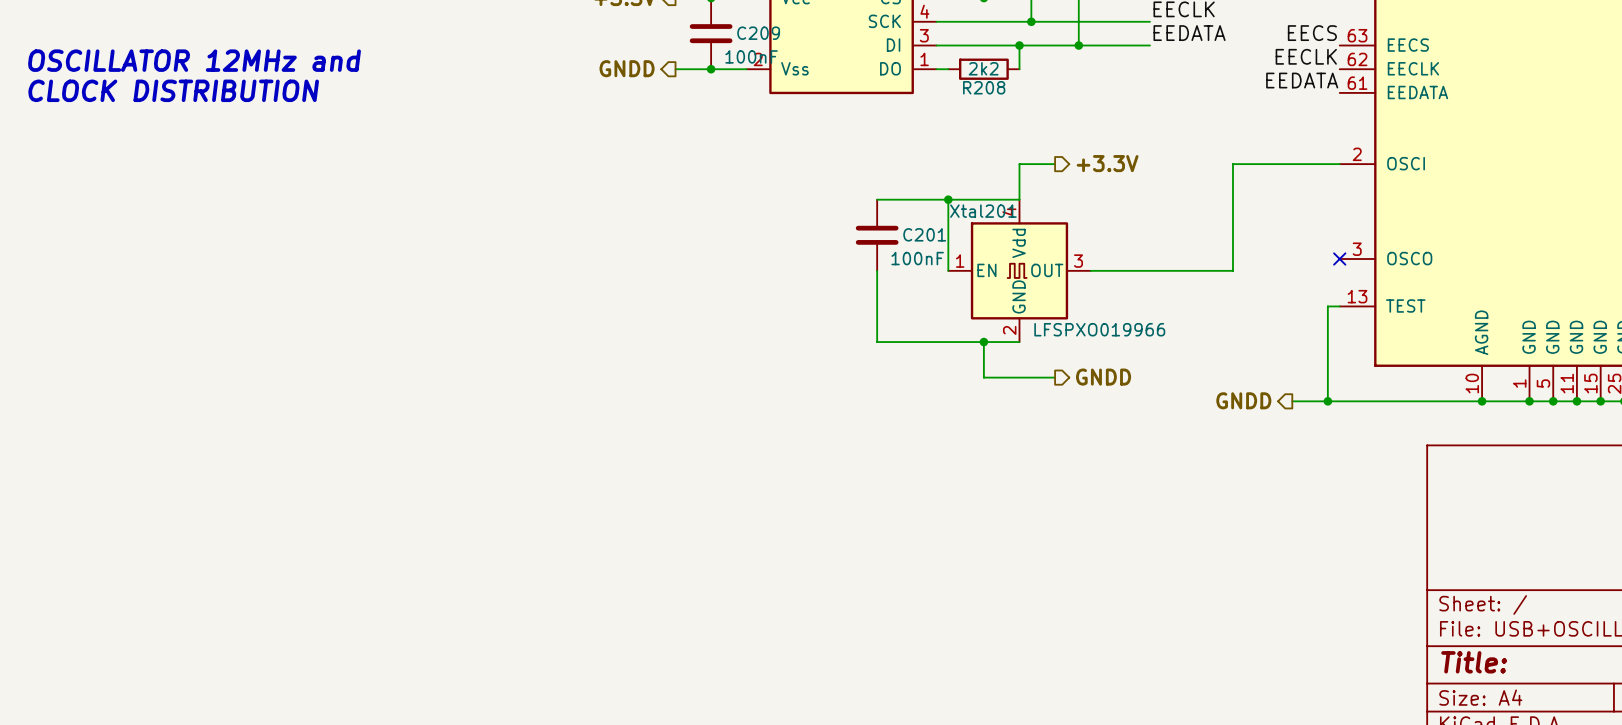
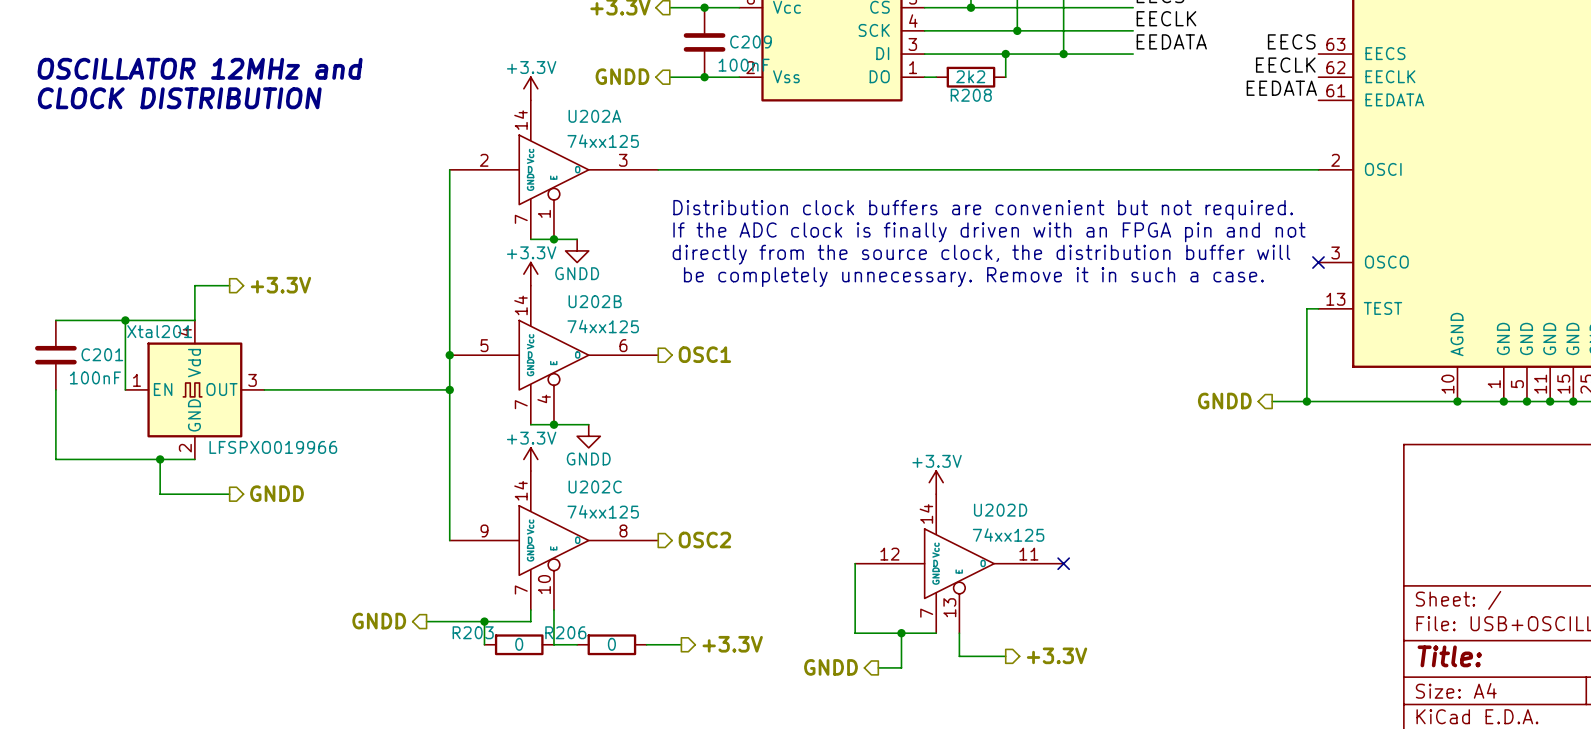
power symbol: none -> +3.3V (530, 88)
hierarchical label: +3.3V (1107, 163) -> none
wire: none -> (449, 169) (449, 540)
U202A: none -> 74xx125 (553, 169)
wire: (1019, 164) (1019, 199) (877, 199) -> (1005, 169) (658, 169)
wire: (1232, 164) (1232, 270) (1090, 270) -> (1214, 169) (1040, 169)
wire: (948, 199) (948, 270) -> none
junction: (948, 199) -> none
text: none -> Distribution clock buffers are convenient but not required. (983, 209)
text: none -> If the ADC clock is finally driven with an FPGA pin and not (989, 232)
wire: none -> (530, 239) (577, 239)
junction: none -> (553, 239)
C201 position: (877, 235) -> (55, 355)
power symbol: none -> GNDD (577, 250)
text: none -> directly from the source clock, the distribution buffer will (981, 254)
power symbol: none -> +3.3V (530, 274)
wire: (877, 270) (877, 342) (1019, 342) -> none
Xtal201 position: (1019, 270) -> (194, 389)
text: none -> be completely unnecessary. Remove it in such a case. (973, 277)
wire: none -> (229, 285) (194, 285) (194, 320) (55, 320)
hierarchical label: none -> +3.3V (280, 285)
wire: none -> (125, 320) (125, 389)
junction: none -> (125, 320)
wire: (983, 342) (983, 377) (1055, 377) -> none
junction: (983, 342) -> none
junction: none -> (449, 355)
U202B: none -> 74xx125 (553, 355)
hierarchical label: none -> OSC1 (704, 354)
hierarchical label: GNDD (1103, 377) -> none
wire: none -> (55, 389) (55, 459) (194, 459)
wire: none -> (264, 389) (449, 389)
junction: none -> (449, 389)
wire: none -> (530, 424) (588, 424)
junction: none -> (553, 424)
power symbol: none -> GNDD (588, 436)
wire: none -> (160, 459) (160, 494) (229, 494)
junction: none -> (160, 459)
power symbol: none -> +3.3V (530, 459)
power symbol: none -> +3.3V (936, 482)
hierarchical label: none -> GNDD (276, 493)
U202C: none -> 74xx125 (553, 540)
hierarchical label: none -> OSC2 (704, 540)
wire: none -> (855, 563) (855, 633) (936, 633)
U202D: none -> 74xx125 (959, 563)
no-connect mark: none -> (1063, 563)
wire: none -> (530, 610) (530, 621) (426, 621)
wire: none -> (553, 610) (553, 644) (577, 644)
hierarchical label: none -> GNDD (379, 621)
wire: none -> (484, 621) (484, 644)
junction: none -> (484, 621)
wire: none -> (901, 633) (901, 667) (878, 667)
junction: none -> (901, 633)
wire: none -> (959, 633) (959, 656) (1005, 656)
hierarchical label: none -> +3.3V (732, 644)
R203: none -> 0 (519, 644)
R206: none -> 0 (611, 644)
wire: none -> (646, 644) (681, 644)
hierarchical label: none -> +3.3V (1057, 655)
hierarchical label: none -> GNDD (830, 667)

